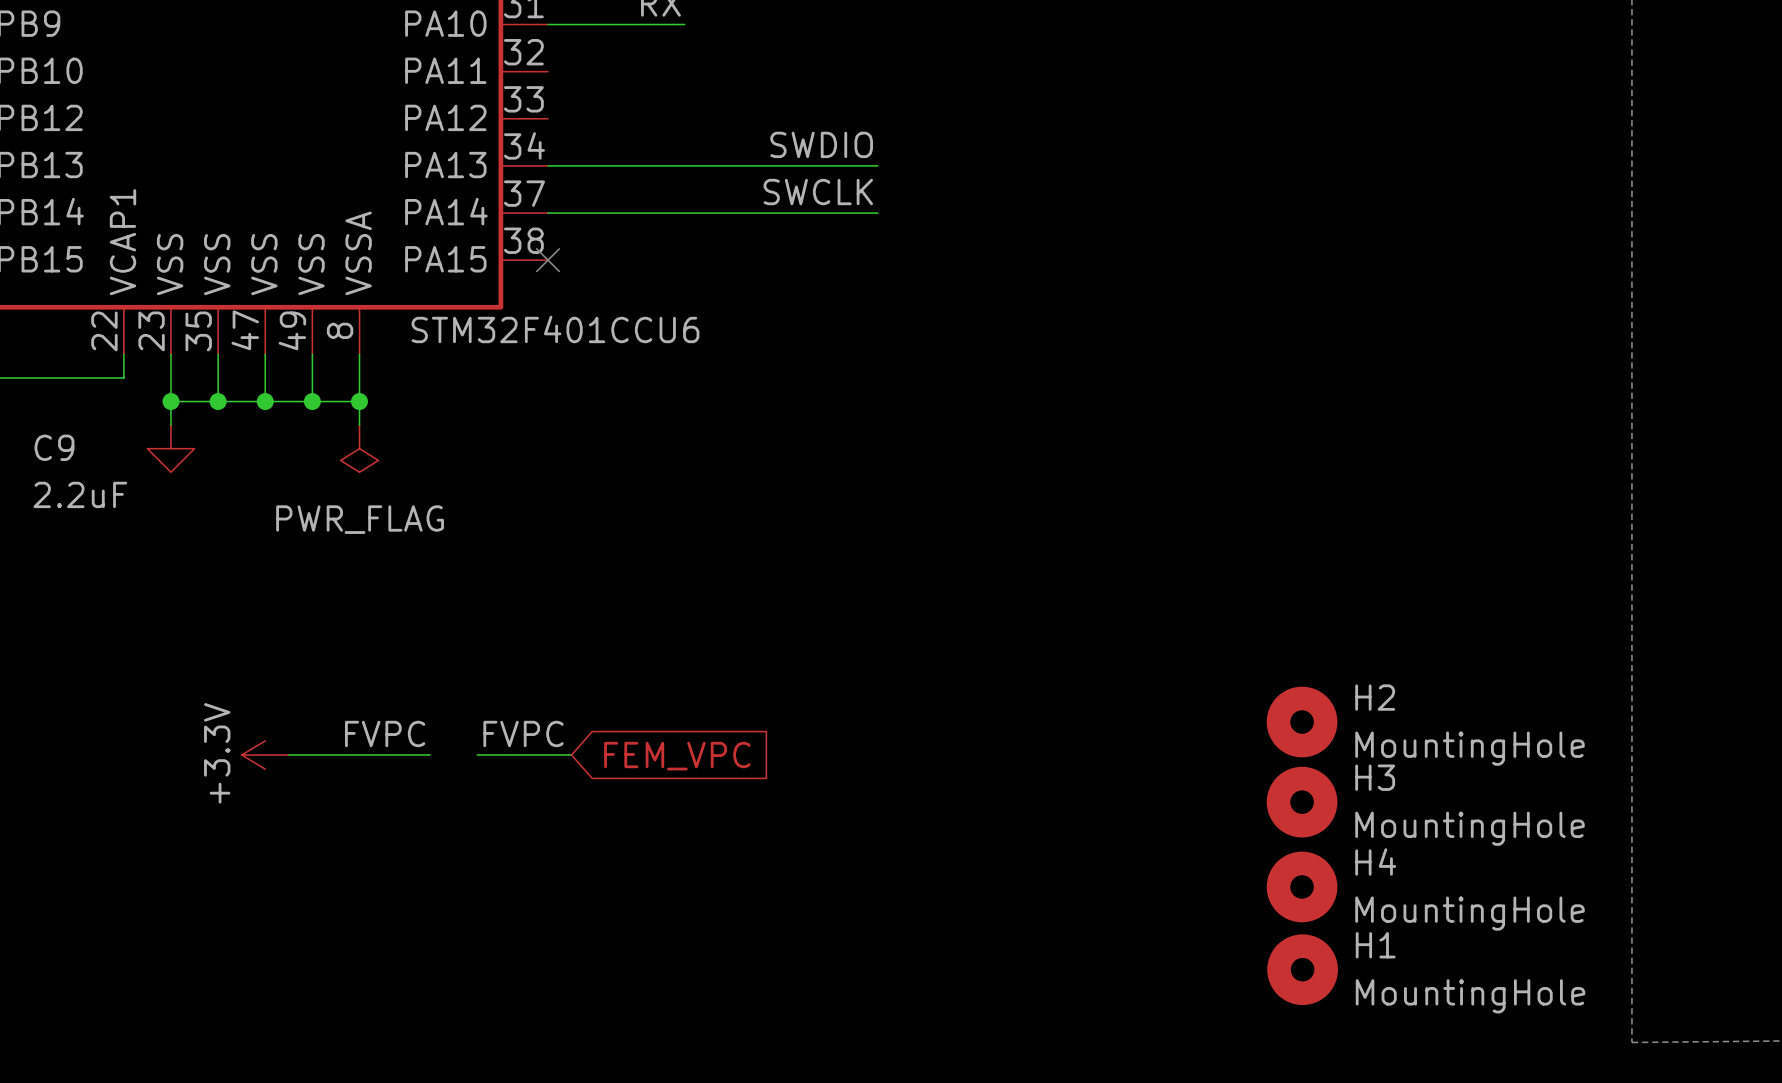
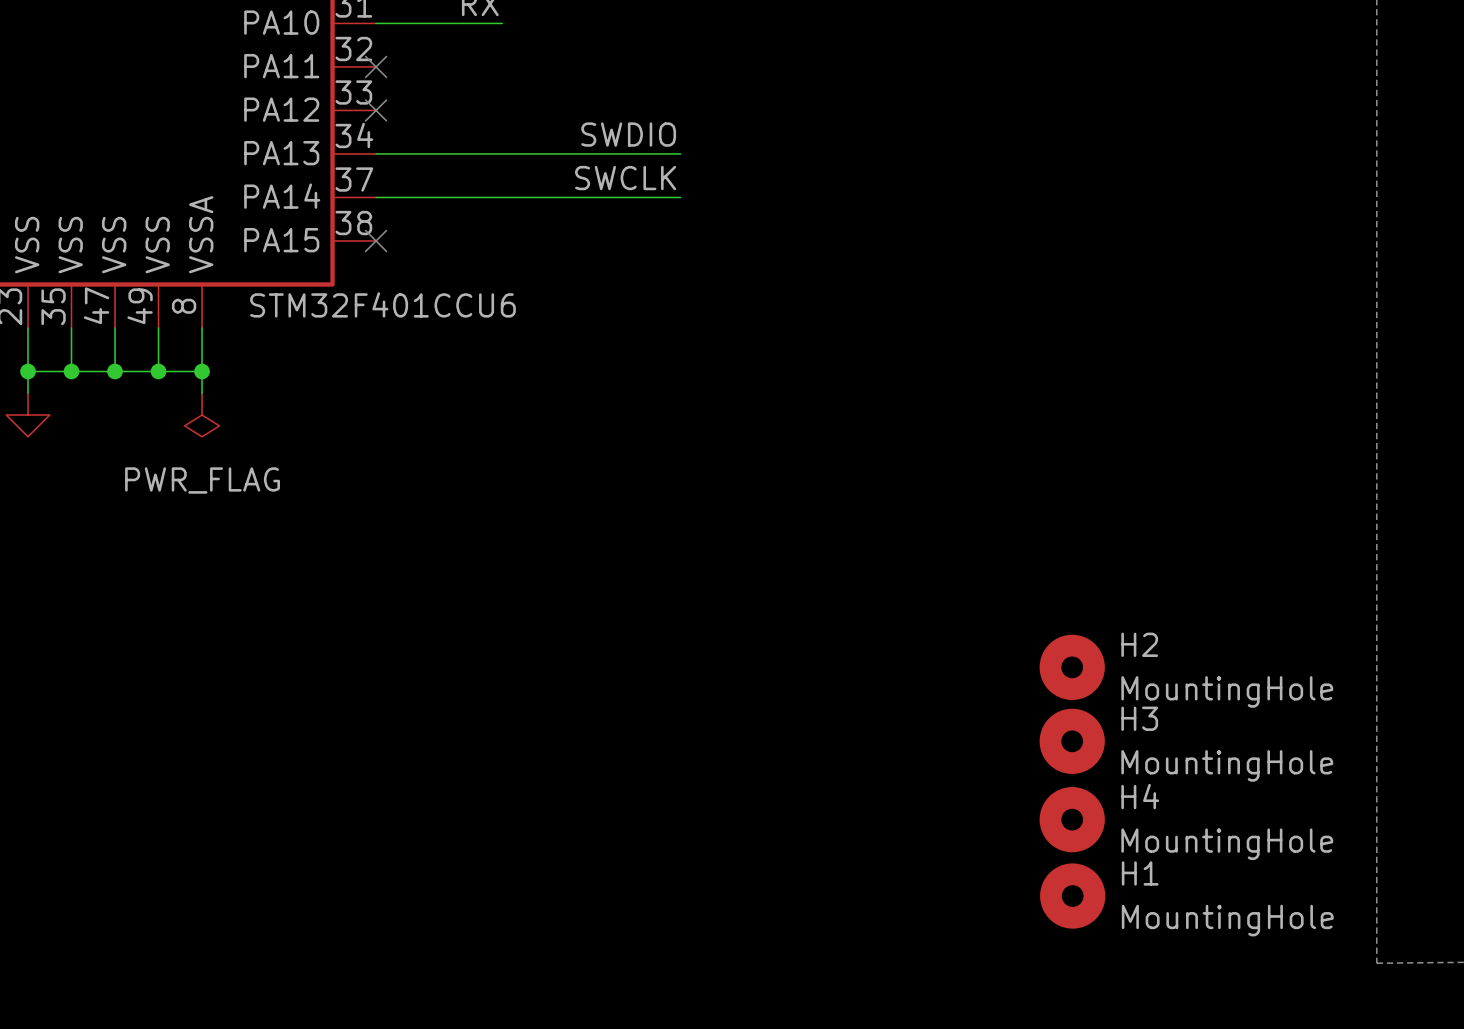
no-connect mark: none -> (376, 66)
no-connect mark: none -> (376, 110)
label: FVPC (385, 733) -> none
label: FVPC (523, 733) -> none
power symbol: +3.3V (265, 755) -> none
wire: (288, 755) (430, 755) -> none
wire: (477, 755) (571, 755) -> none
global label: FEM_VPC (677, 756) -> none

